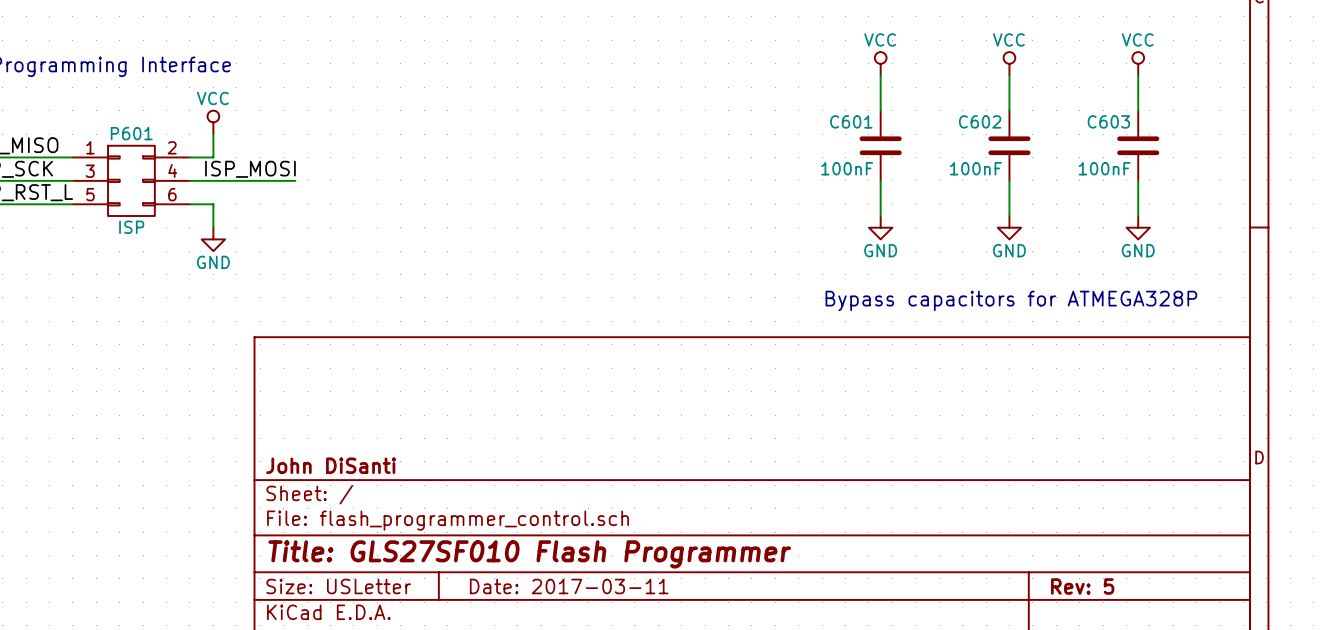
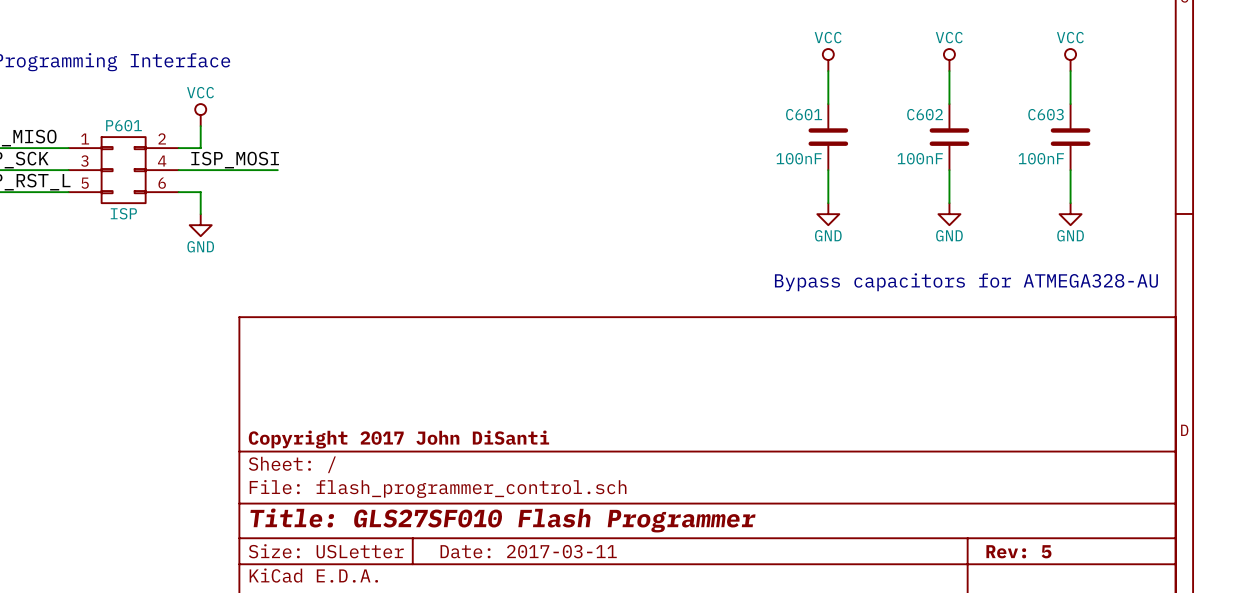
text: Bypass capacitors for ATMEGA328P (1011, 300) -> Bypass capacitors for ATMEGA328-AU (966, 282)
title block: John DiSanti (331, 465) -> Copyright 2017 John DiSanti (398, 439)

